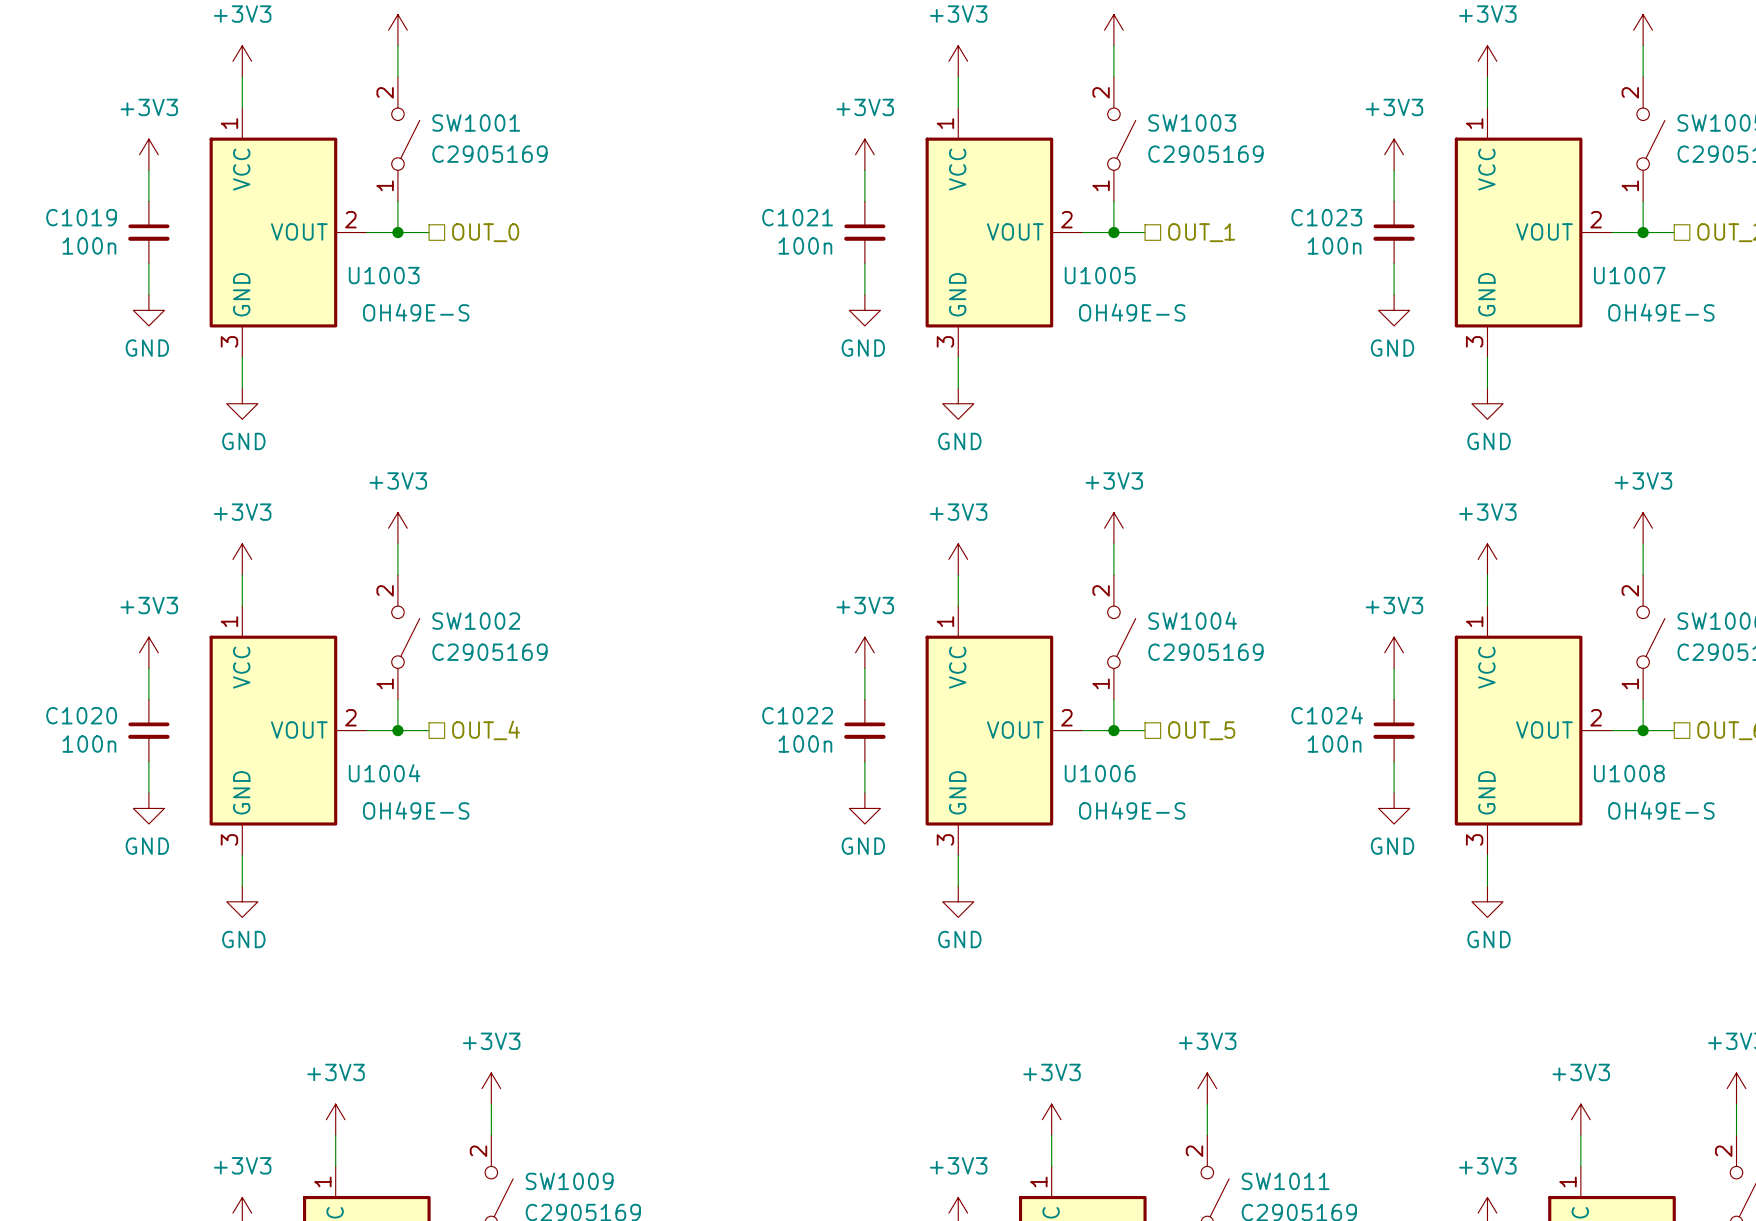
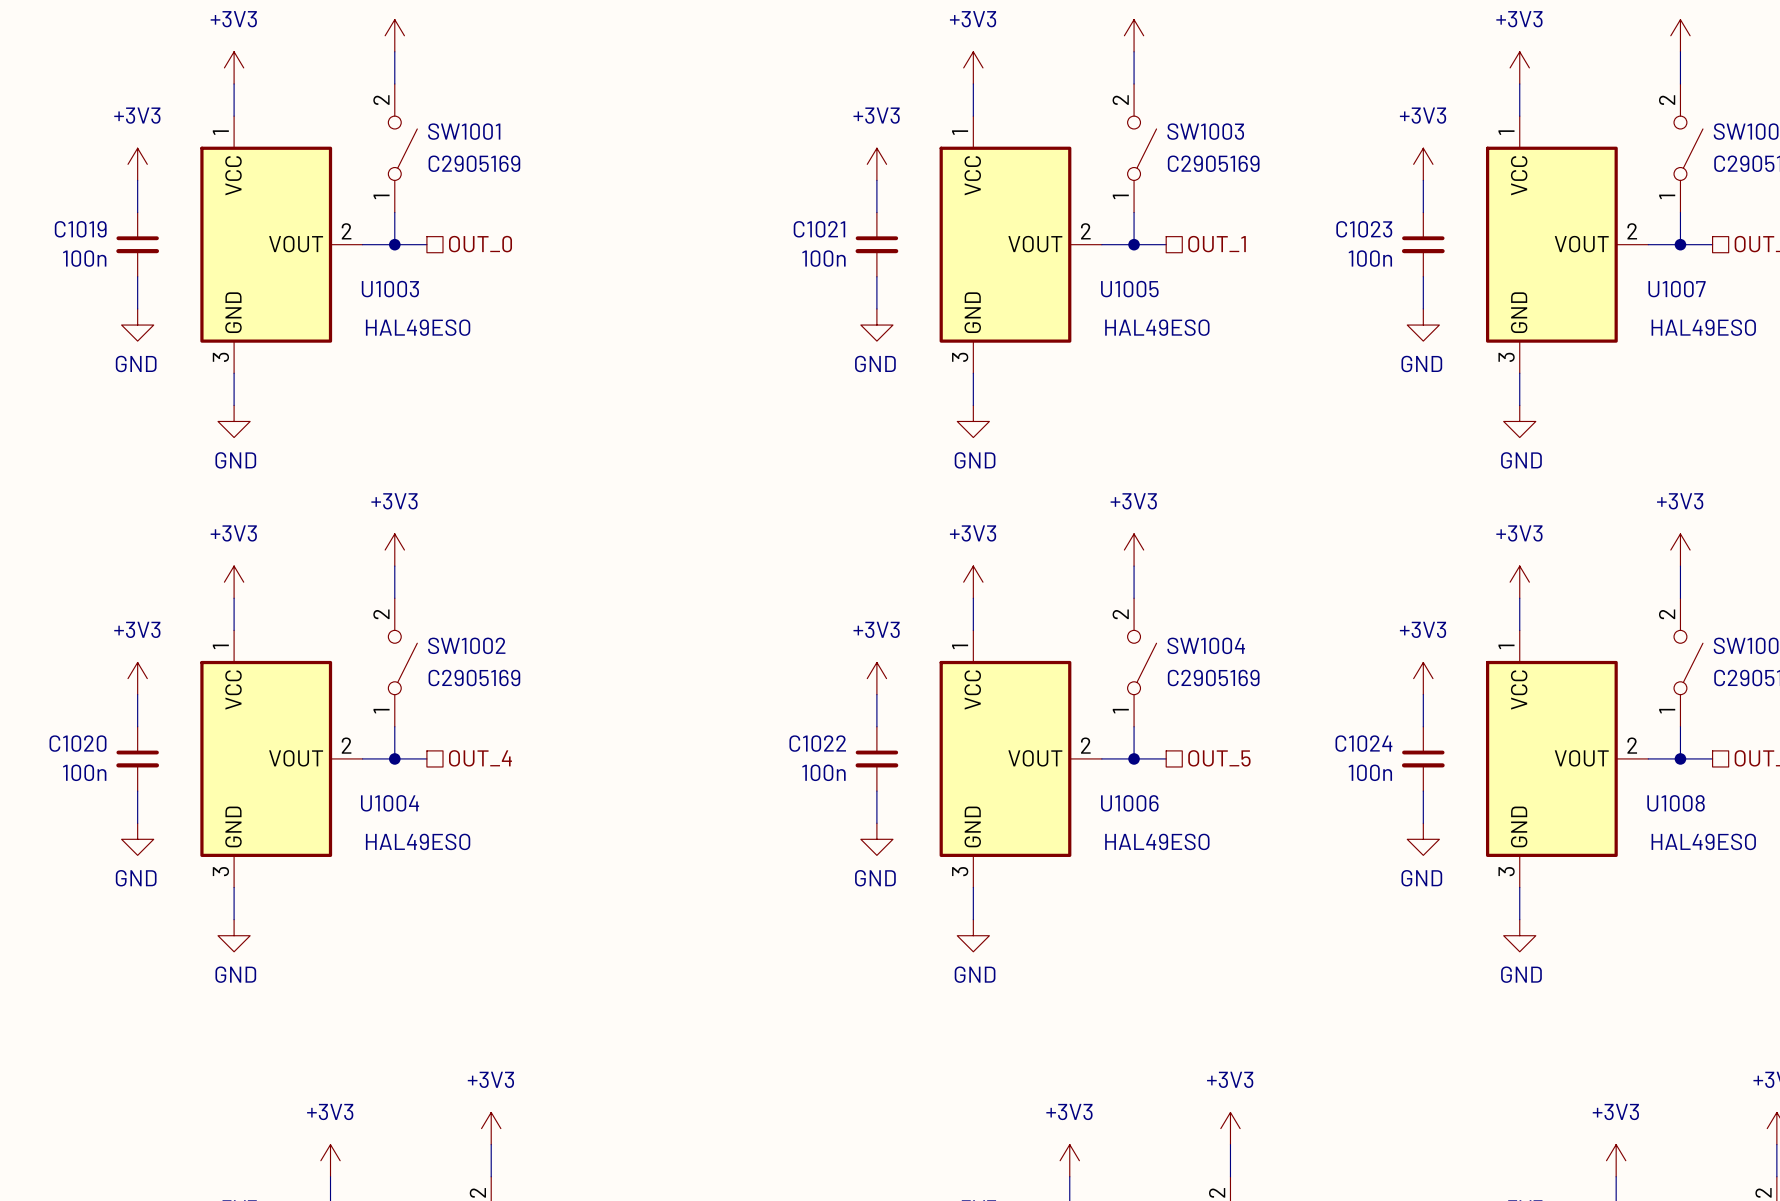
U1003 value: OH49E-S (416, 312) -> HAL49ESO (418, 327)
U1005 value: OH49E-S (1132, 312) -> HAL49ESO (1157, 327)
U1007 value: OH49E-S (1661, 312) -> HAL49ESO (1703, 327)
U1004 value: OH49E-S (416, 810) -> HAL49ESO (418, 841)
U1006 value: OH49E-S (1132, 810) -> HAL49ESO (1157, 841)
U1008 value: OH49E-S (1661, 810) -> HAL49ESO (1703, 841)

